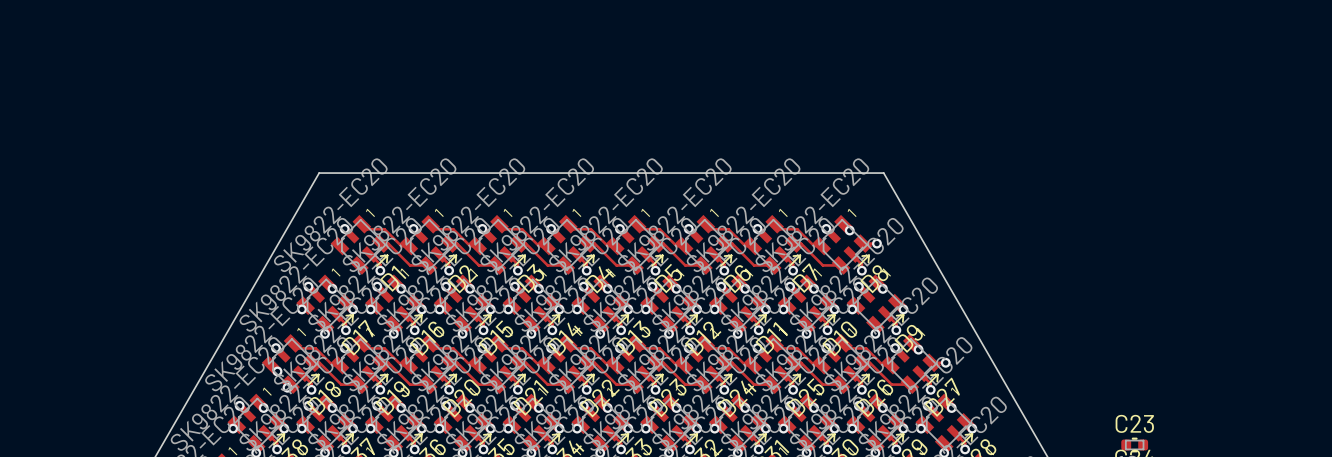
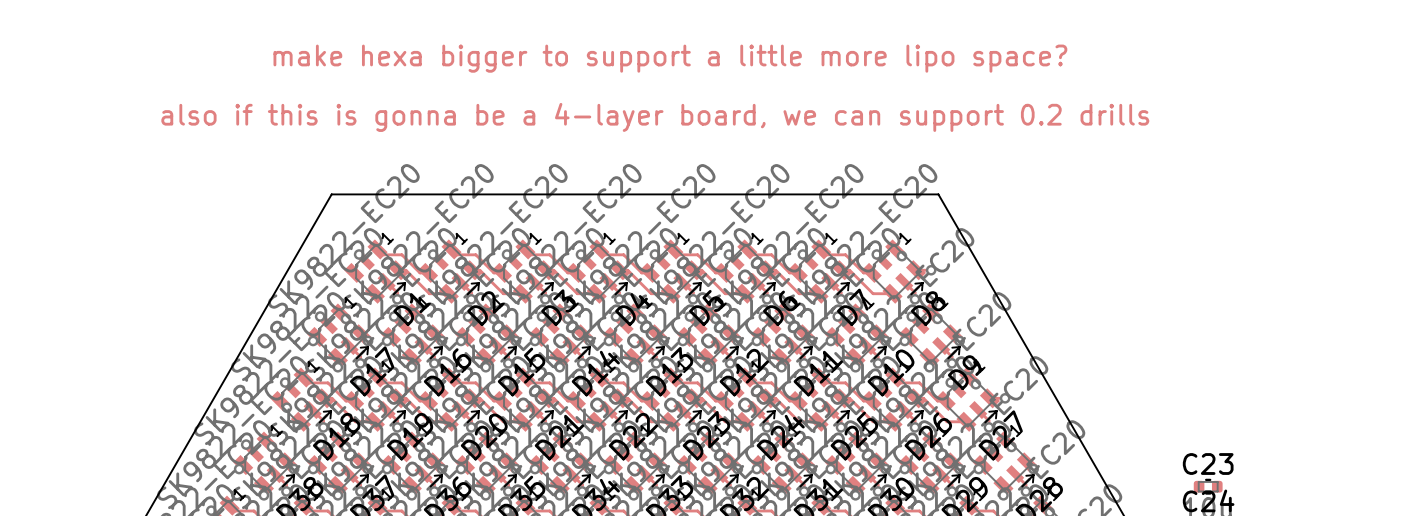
text: none -> make hexa bigger to support a little more lipo space? (670, 58)
text: none -> also if this is gonna be a 4-layer board, we can support 0.2 drills (655, 117)

